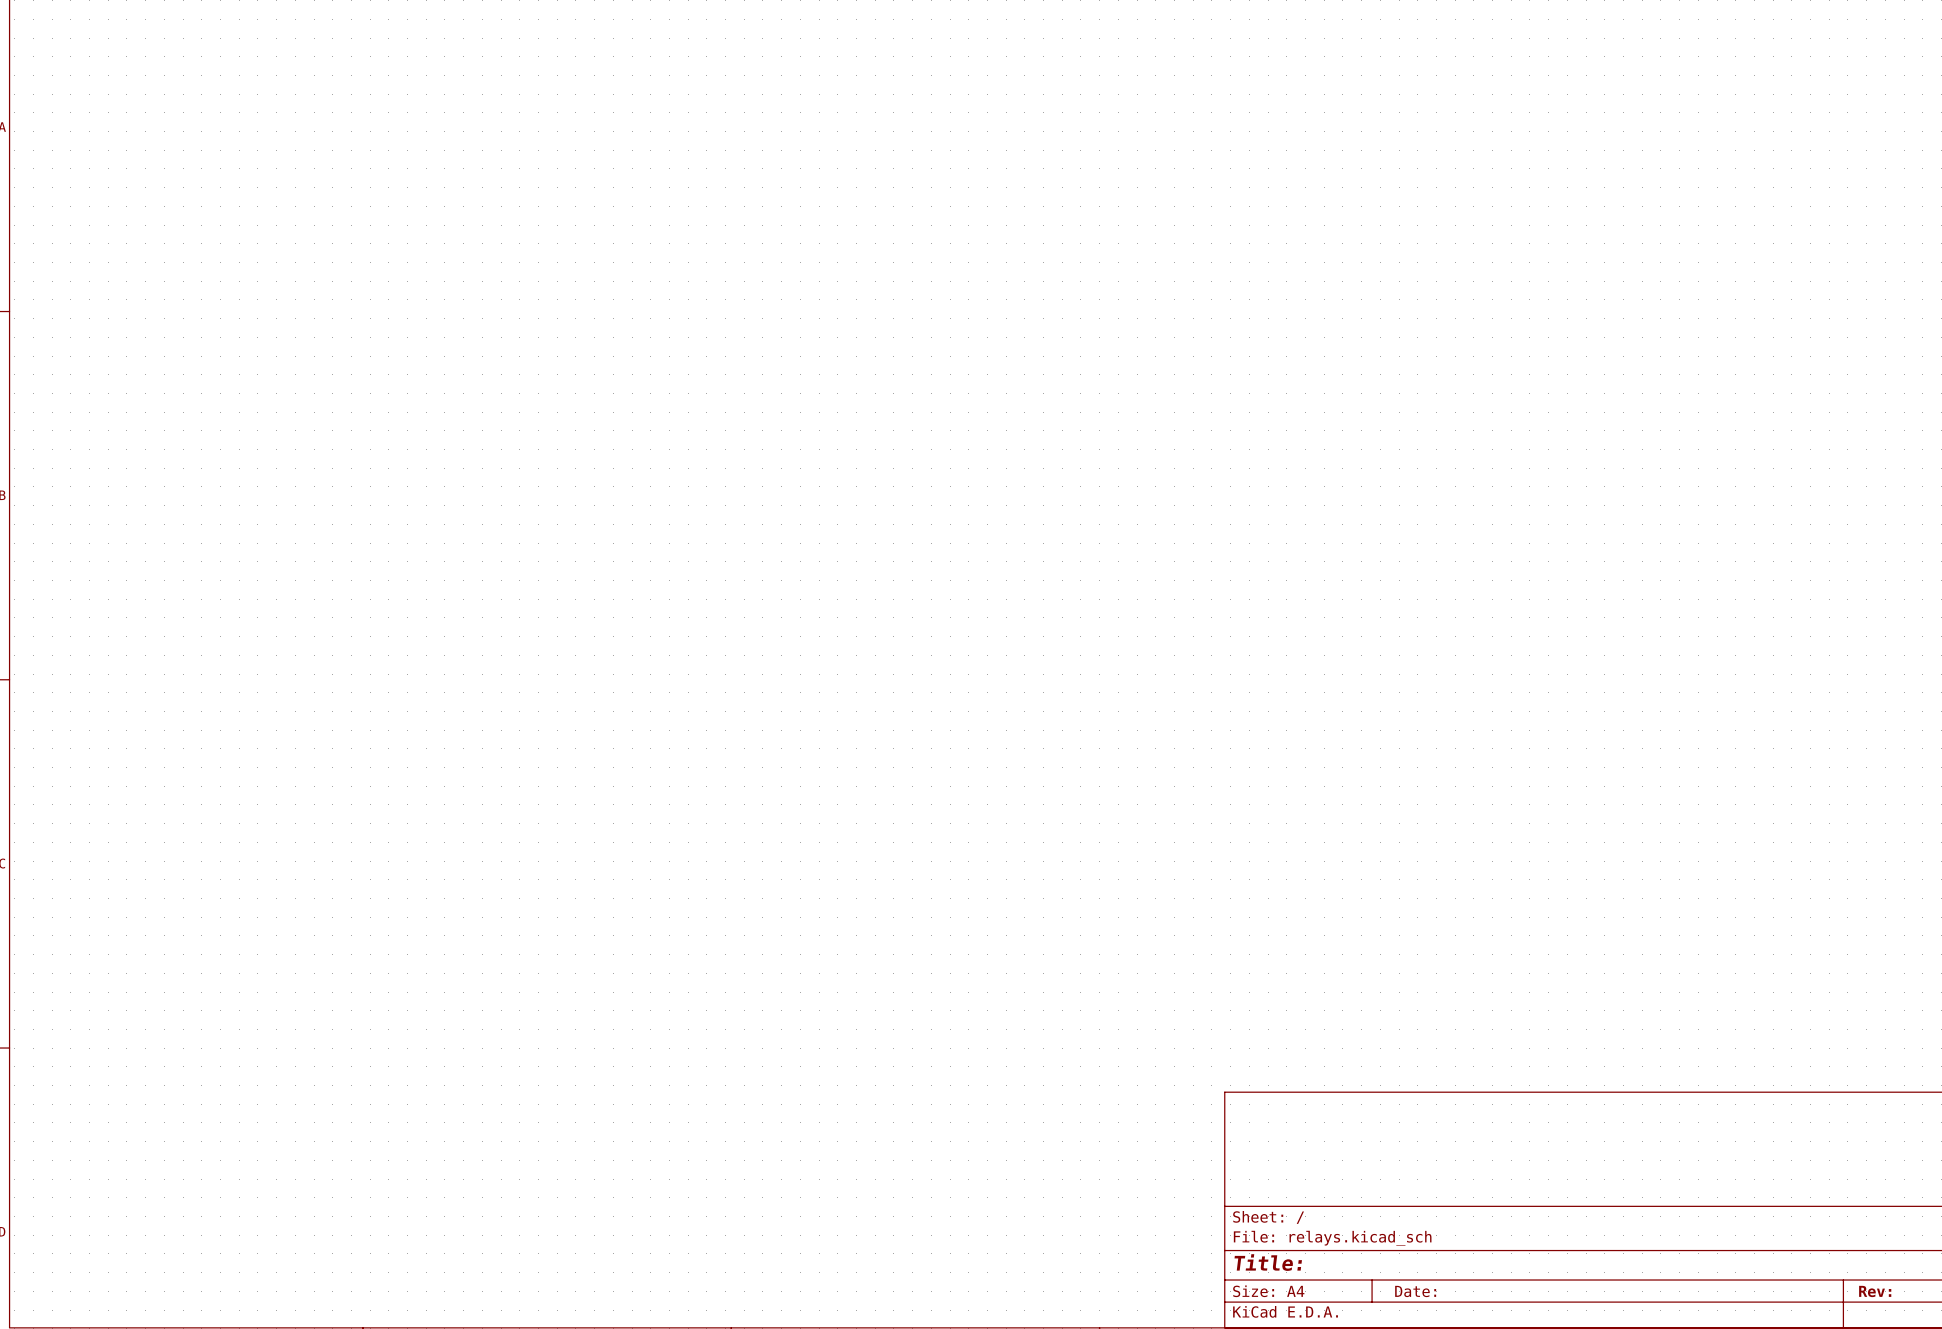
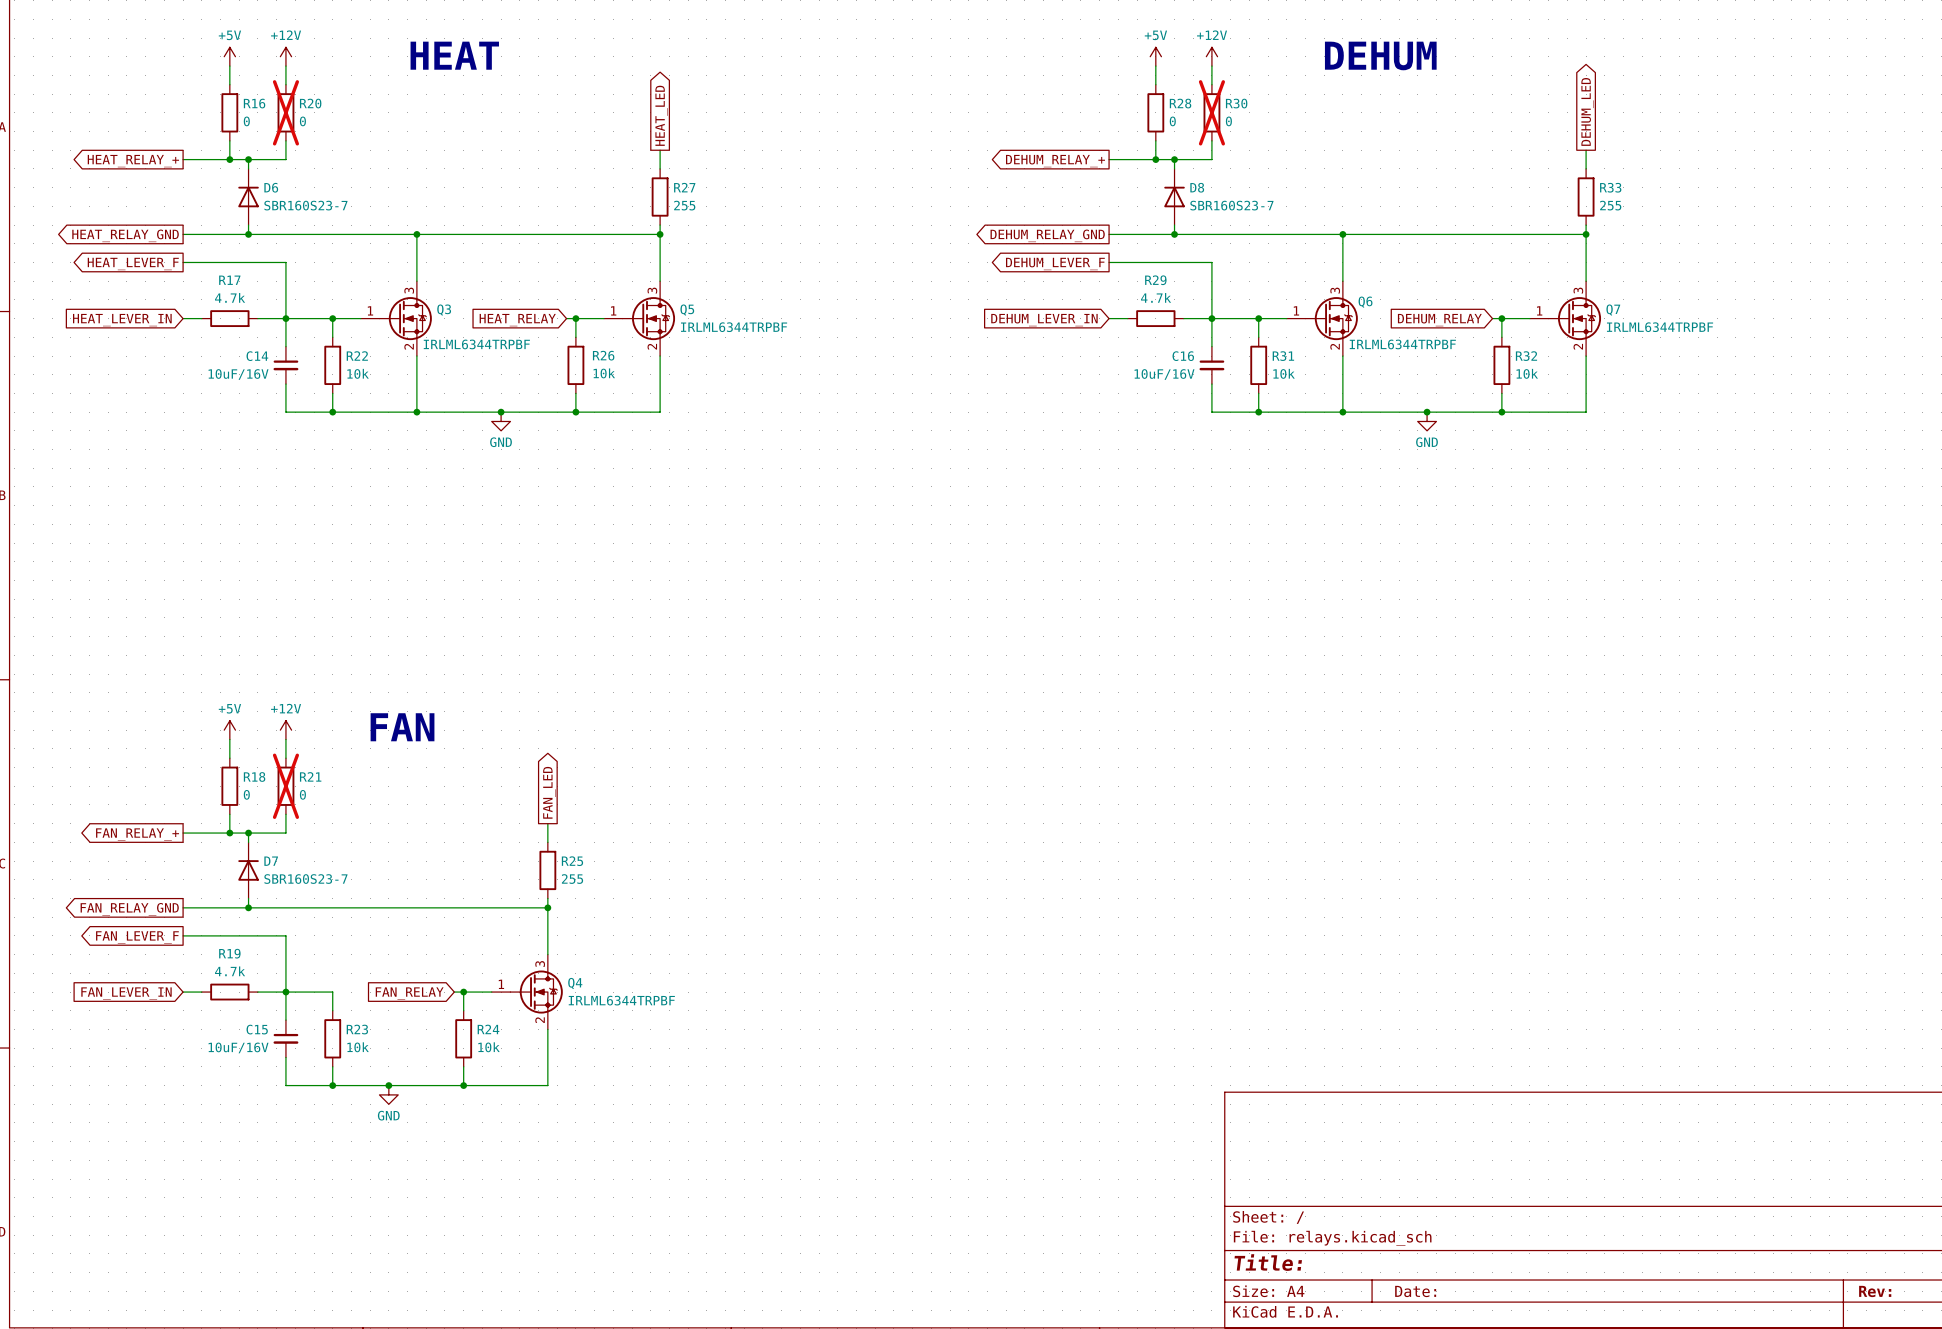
text: none -> HEAT (454, 55)
text: none -> DEHUM (1380, 55)
power symbol: none -> +5V (229, 56)
power symbol: none -> +12V (285, 56)
power symbol: none -> +5V (1155, 56)
power symbol: none -> +12V (1211, 56)
wire: none -> (229, 66) (229, 84)
wire: none -> (285, 66) (285, 84)
wire: none -> (1155, 66) (1155, 84)
wire: none -> (1211, 66) (1211, 84)
global label: none -> DEHUM_LED (1587, 111)
R16: none -> 0 (229, 112)
R20: none -> 0 (285, 112)
R28: none -> 0 (1155, 112)
R30: none -> 0 (1211, 112)
global label: none -> HEAT_LED (661, 115)
wire: none -> (229, 140) (229, 159)
wire: none -> (285, 140) (285, 159) (183, 159)
wire: none -> (1155, 140) (1155, 159)
wire: none -> (1211, 140) (1211, 159) (1109, 159)
wire: none -> (660, 150) (660, 168)
wire: none -> (1586, 150) (1586, 168)
junction: none -> (229, 159)
wire: none -> (248, 159) (248, 168)
junction: none -> (248, 159)
junction: none -> (1155, 159)
wire: none -> (1174, 159) (1174, 168)
junction: none -> (1174, 159)
global label: none -> HEAT_RELAY_+ (133, 161)
global label: none -> DEHUM_RELAY_+ (1055, 161)
D6: none -> SBR160S23-7 (248, 197)
R27: none -> 255 (660, 197)
D8: none -> SBR160S23-7 (1174, 197)
R33: none -> 255 (1586, 197)
wire: none -> (248, 225) (248, 234)
wire: none -> (660, 225) (660, 281)
wire: none -> (1174, 225) (1174, 234)
wire: none -> (1586, 225) (1586, 281)
wire: none -> (183, 234) (660, 234)
junction: none -> (248, 234)
wire: none -> (416, 234) (416, 281)
junction: none -> (416, 234)
junction: none -> (660, 234)
wire: none -> (1109, 234) (1586, 234)
junction: none -> (1174, 234)
wire: none -> (1342, 234) (1342, 281)
junction: none -> (1342, 234)
junction: none -> (1586, 234)
global label: none -> HEAT_RELAY_GND (125, 235)
global label: none -> DEHUM_RELAY_GND (1047, 235)
wire: none -> (183, 262) (285, 262) (285, 346)
wire: none -> (1109, 262) (1211, 262) (1211, 346)
global label: none -> HEAT_LEVER_F (133, 263)
global label: none -> DEHUM_LEVER_F (1055, 263)
wire: none -> (183, 318) (201, 318)
R17: none -> 4.7k (229, 318)
wire: none -> (257, 318) (360, 318)
junction: none -> (285, 318)
wire: none -> (332, 318) (332, 337)
junction: none -> (332, 318)
Q3: none -> IRLML6344TRPBF (396, 318)
wire: none -> (566, 318) (603, 318)
wire: none -> (575, 318) (575, 337)
junction: none -> (575, 318)
Q5: none -> IRLML6344TRPBF (639, 318)
wire: none -> (1109, 318) (1127, 318)
R29: none -> 4.7k (1155, 318)
wire: none -> (1183, 318) (1286, 318)
junction: none -> (1211, 318)
wire: none -> (1258, 318) (1258, 337)
junction: none -> (1258, 318)
Q6: none -> IRLML6344TRPBF (1322, 318)
wire: none -> (1492, 318) (1529, 318)
wire: none -> (1501, 318) (1501, 337)
junction: none -> (1501, 318)
Q7: none -> IRLML6344TRPBF (1565, 318)
global label: none -> HEAT_LEVER_IN (122, 320)
global label: none -> HEAT_RELAY (517, 320)
global label: none -> DEHUM_LEVER_IN (1044, 320)
global label: none -> DEHUM_RELAY (1439, 320)
wire: none -> (416, 356) (416, 412)
wire: none -> (660, 356) (660, 412) (285, 412) (285, 384)
wire: none -> (1342, 356) (1342, 412)
wire: none -> (1586, 356) (1586, 412) (1211, 412) (1211, 384)
C14: none -> 10uF/16V (285, 365)
R22: none -> 10k (332, 365)
R26: none -> 10k (575, 365)
C16: none -> 10uF/16V (1211, 365)
R31: none -> 10k (1258, 365)
R32: none -> 10k (1501, 365)
wire: none -> (332, 393) (332, 412)
wire: none -> (575, 393) (575, 412)
wire: none -> (1258, 393) (1258, 412)
wire: none -> (1501, 393) (1501, 412)
junction: none -> (332, 412)
junction: none -> (416, 412)
junction: none -> (501, 412)
junction: none -> (575, 412)
junction: none -> (1258, 412)
junction: none -> (1342, 412)
junction: none -> (1427, 412)
junction: none -> (1501, 412)
power symbol: none -> GND (501, 421)
power symbol: none -> GND (1427, 421)
text: none -> FAN (402, 727)
power symbol: none -> +5V (229, 730)
power symbol: none -> +12V (285, 730)
wire: none -> (229, 739) (229, 758)
wire: none -> (285, 739) (285, 758)
R18: none -> 0 (229, 786)
R21: none -> 0 (285, 786)
global label: none -> FAN_LED (549, 792)
wire: none -> (229, 814) (229, 833)
wire: none -> (285, 814) (285, 833) (183, 833)
wire: none -> (547, 823) (547, 842)
junction: none -> (229, 833)
wire: none -> (248, 833) (248, 842)
junction: none -> (248, 833)
global label: none -> FAN_RELAY_+ (137, 834)
D7: none -> SBR160S23-7 (248, 870)
R25: none -> 255 (547, 870)
wire: none -> (248, 898) (248, 907)
wire: none -> (547, 898) (547, 954)
wire: none -> (183, 907) (547, 907)
junction: none -> (248, 907)
junction: none -> (547, 907)
global label: none -> FAN_RELAY_GND (129, 909)
wire: none -> (183, 935) (285, 935) (285, 1020)
global label: none -> FAN_LEVER_F (137, 937)
wire: none -> (183, 992) (201, 992)
R19: none -> 4.7k (229, 992)
wire: none -> (257, 992) (332, 992) (332, 1010)
junction: none -> (285, 992)
wire: none -> (454, 992) (491, 992)
wire: none -> (463, 992) (463, 1010)
junction: none -> (463, 992)
Q4: none -> IRLML6344TRPBF (527, 992)
global label: none -> FAN_LEVER_IN (126, 993)
global label: none -> FAN_RELAY (409, 993)
wire: none -> (547, 1029) (547, 1085) (285, 1085) (285, 1057)
C15: none -> 10uF/16V (285, 1038)
R23: none -> 10k (332, 1038)
R24: none -> 10k (463, 1038)
wire: none -> (332, 1066) (332, 1085)
wire: none -> (463, 1066) (463, 1085)
junction: none -> (332, 1085)
junction: none -> (388, 1085)
junction: none -> (463, 1085)
power symbol: none -> GND (388, 1094)

